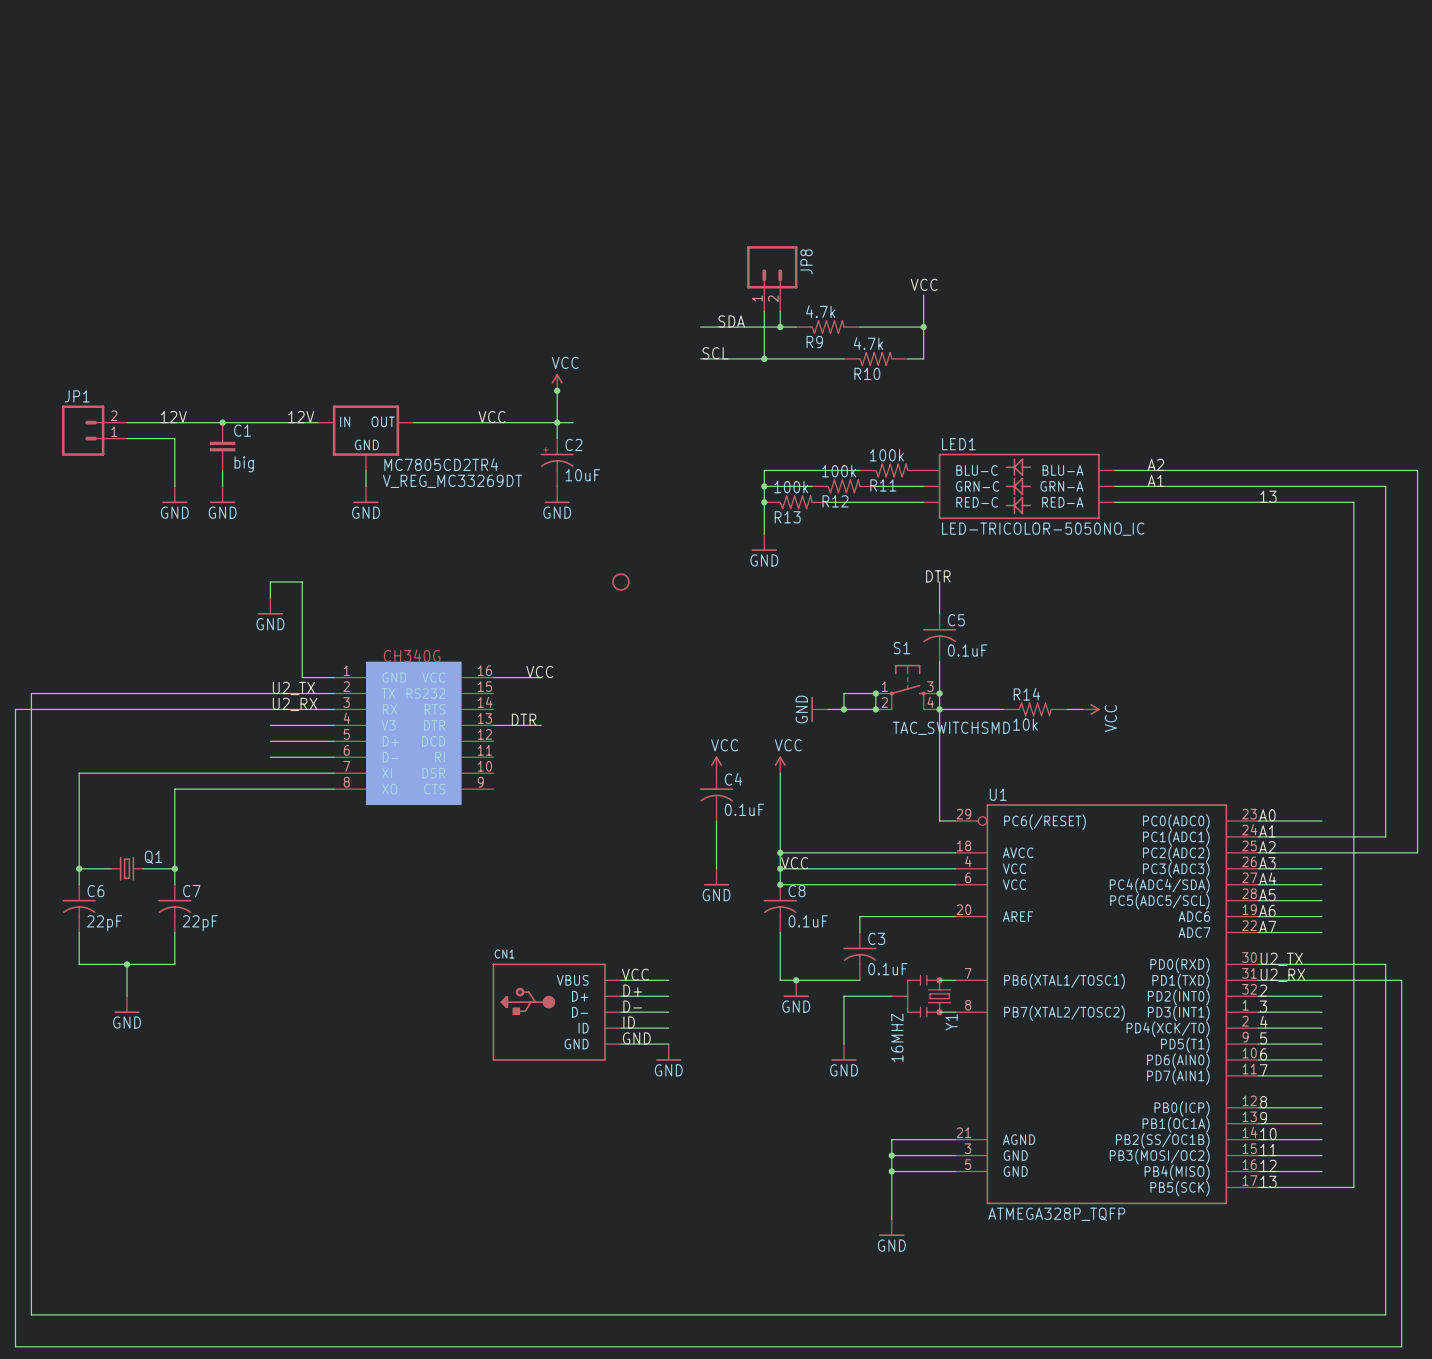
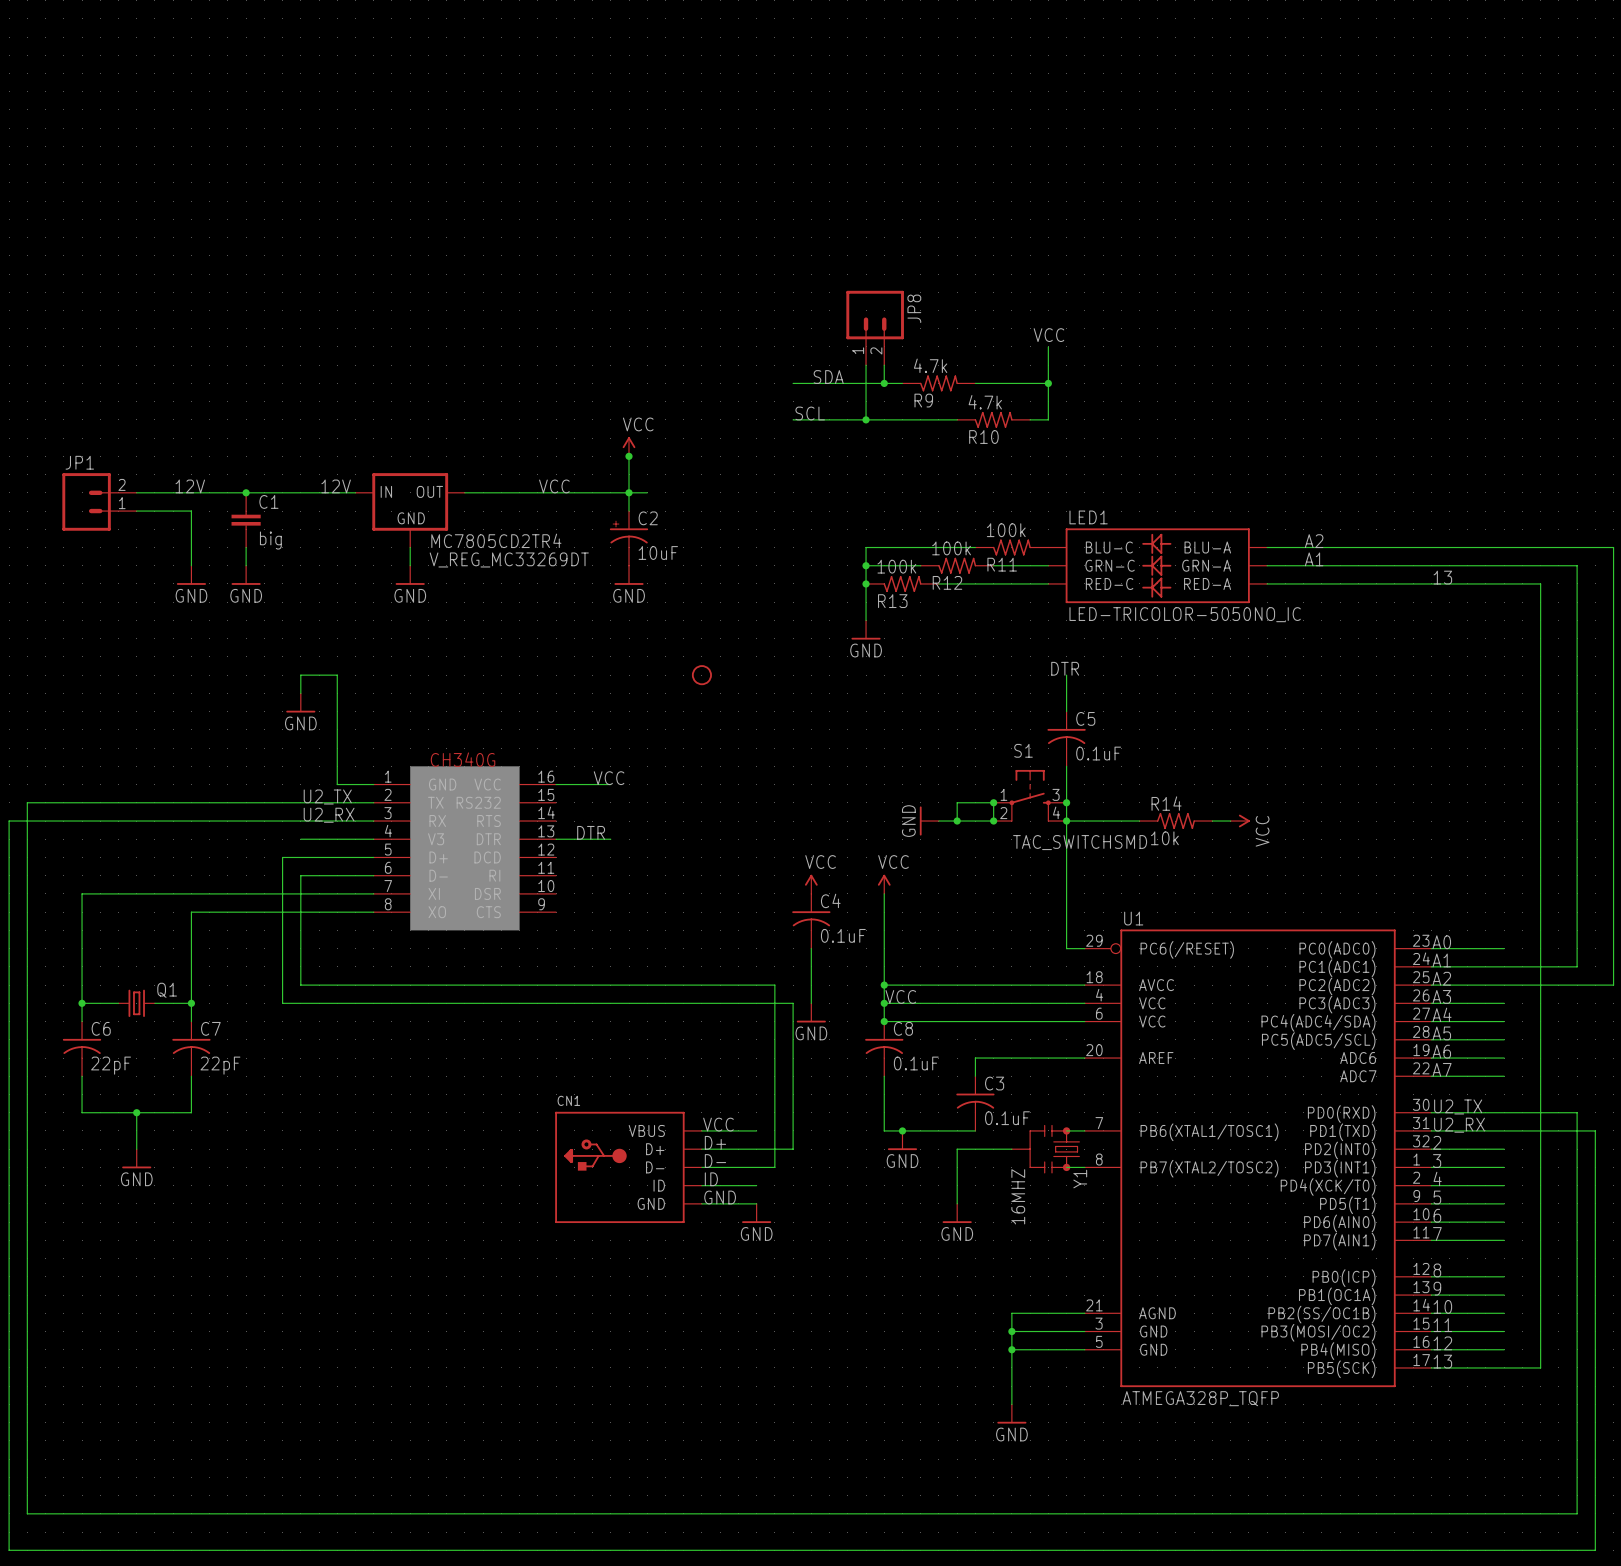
wire: none -> (300, 857) (282, 857) (282, 1003) (793, 1003) (793, 1149) (756, 1149)
wire: none -> (300, 875) (300, 985) (774, 985) (774, 1167) (756, 1167)

